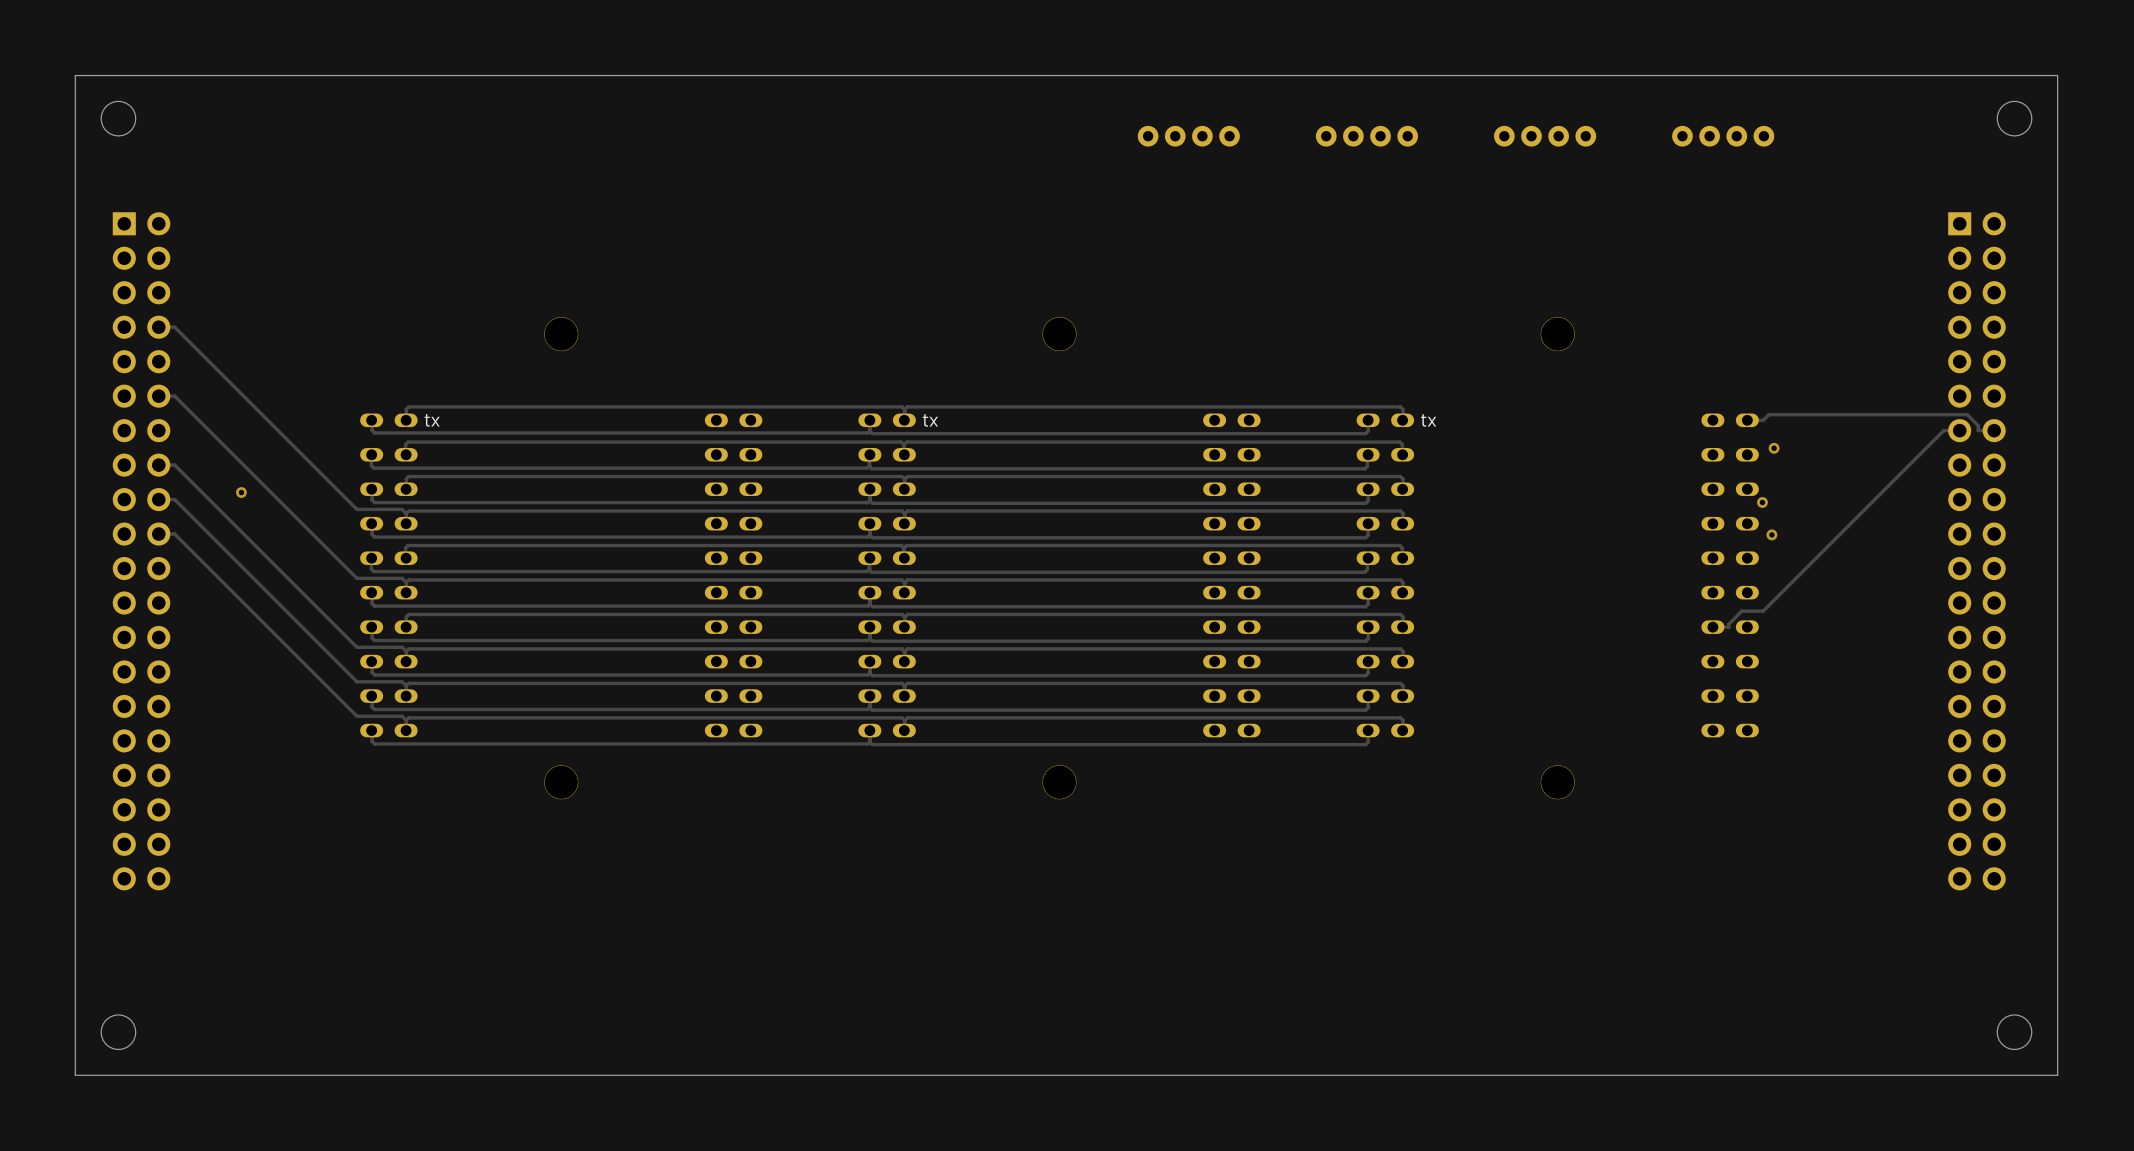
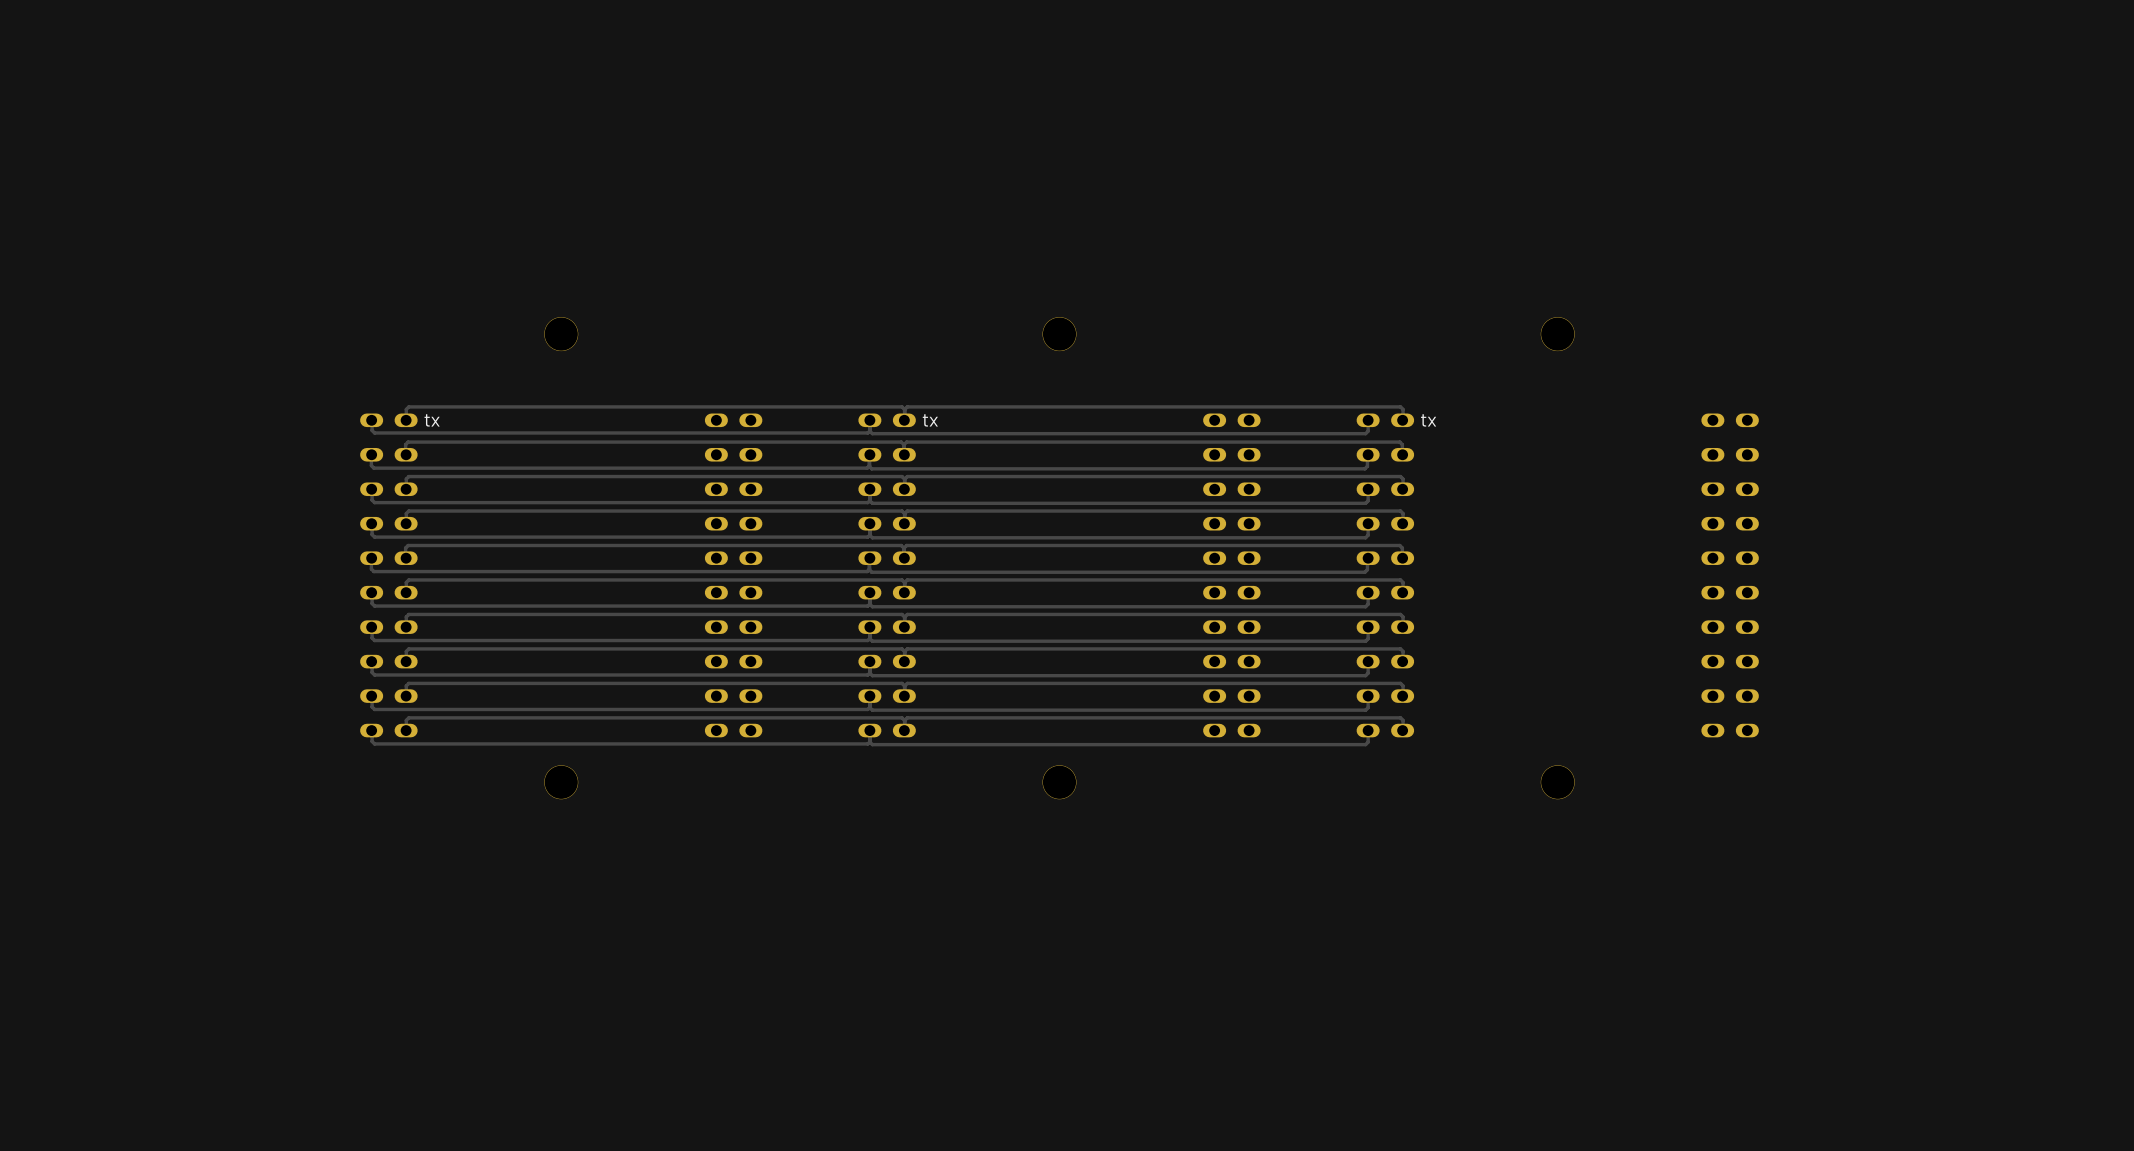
board edge: (2057, 75) (2057, 1075) (75, 1075) (75, 75) (2057, 75) -> none
round board edge: [100, 101, 137, 137] -> none
round board edge: [1996, 101, 2033, 137] -> none
part: (1188, 136) -> none
part: (1366, 136) -> none
part: (1545, 136) -> none
part: (1723, 136) -> none
track: (158, 327) (174, 327) (356, 509) (402, 509) (406, 513) -> none
track: (158, 396) (174, 396) (356, 578) (402, 578) (406, 582) -> none
track: (1747, 420) (1763, 420) (1768, 414) (1967, 414) (1978, 425) (1978, 430) (1994, 430) -> none
track: (1959, 430) (1943, 430) (1763, 611) (1741, 611) (1728, 624) (1728, 627) (1712, 627) -> none
via: (1774, 448) -> none
track: (158, 465) (174, 465) (356, 647) (402, 647) (406, 651) -> none
via: (241, 492) -> none
track: (158, 499) (174, 499) (356, 681) (402, 681) (406, 685) -> none
via: (1762, 502) -> none
track: (158, 534) (174, 534) (356, 716) (402, 716) (406, 720) -> none
via: (1771, 534) -> none
part: (141, 551) -> none
part: (1976, 551) -> none
round board edge: [100, 1014, 137, 1050] -> none
round board edge: [1996, 1014, 2033, 1050] -> none

